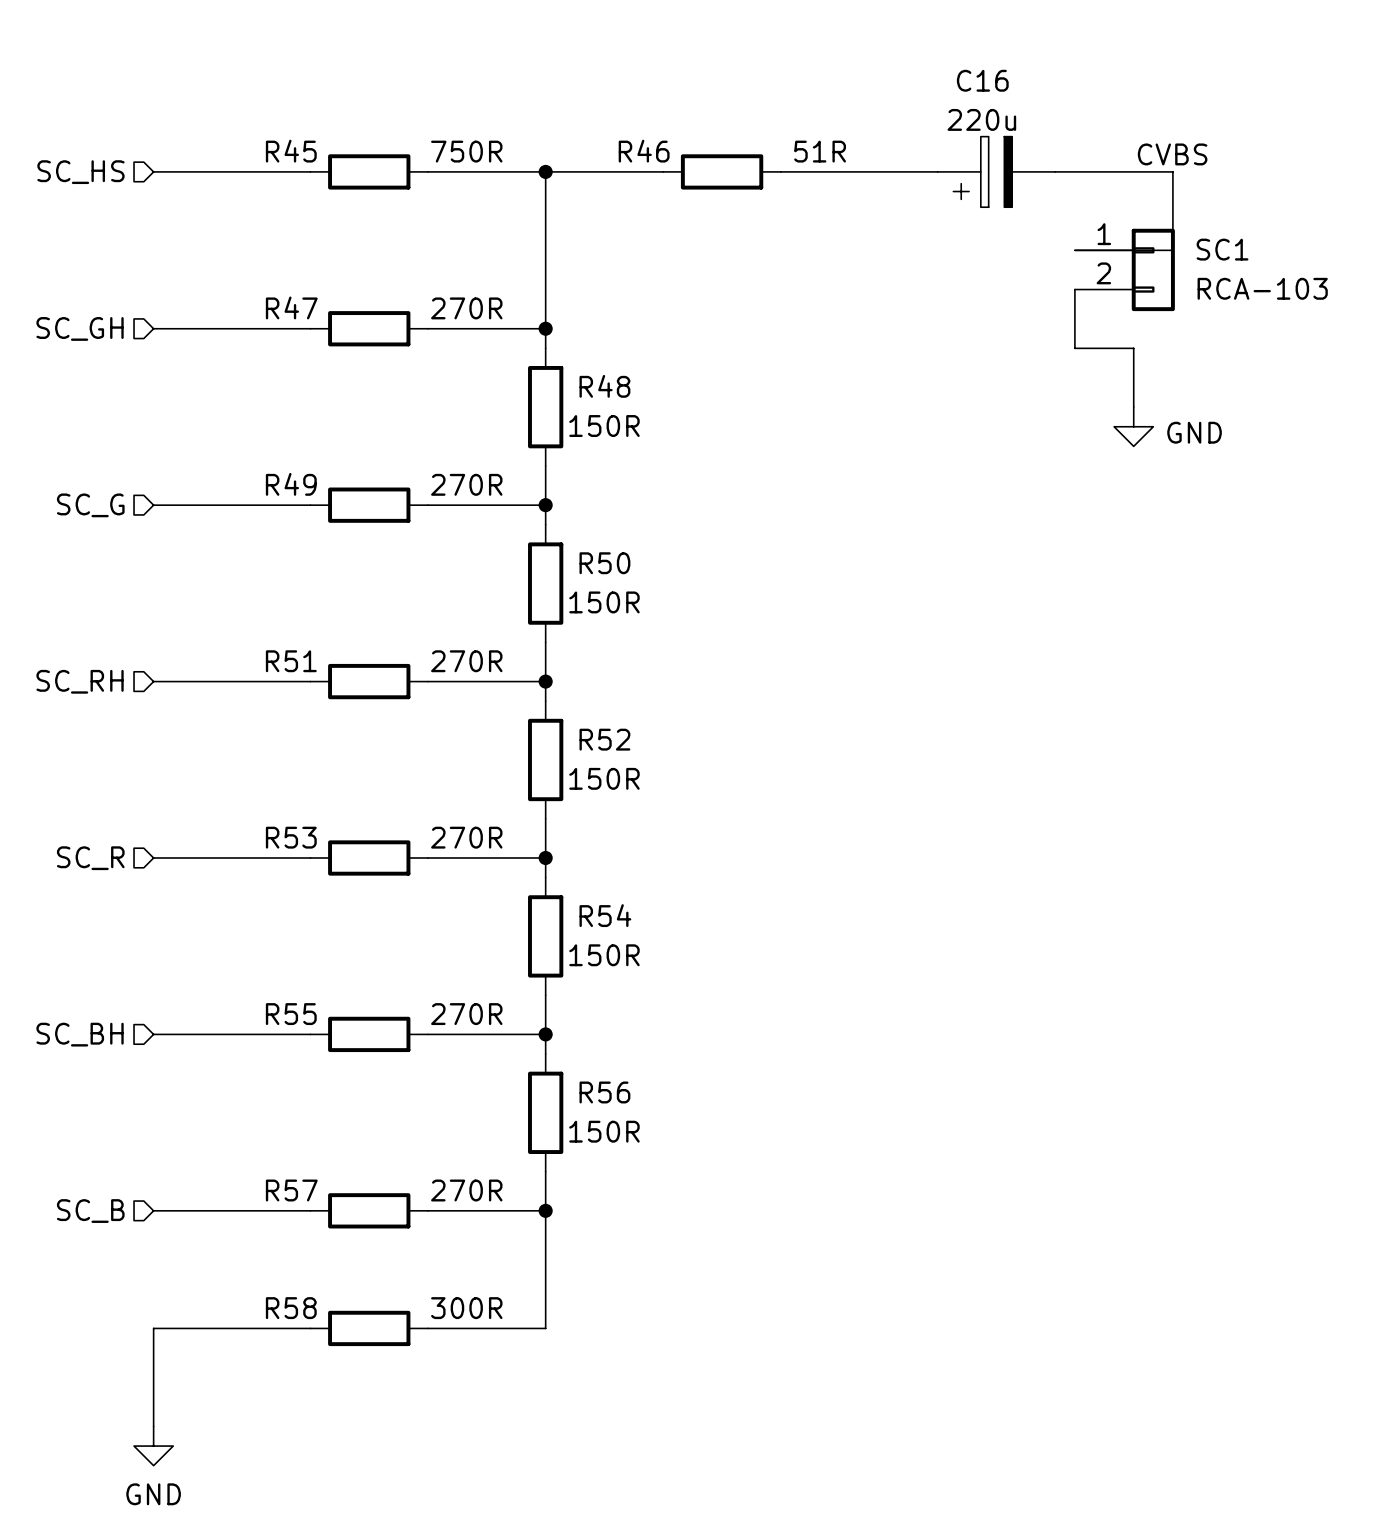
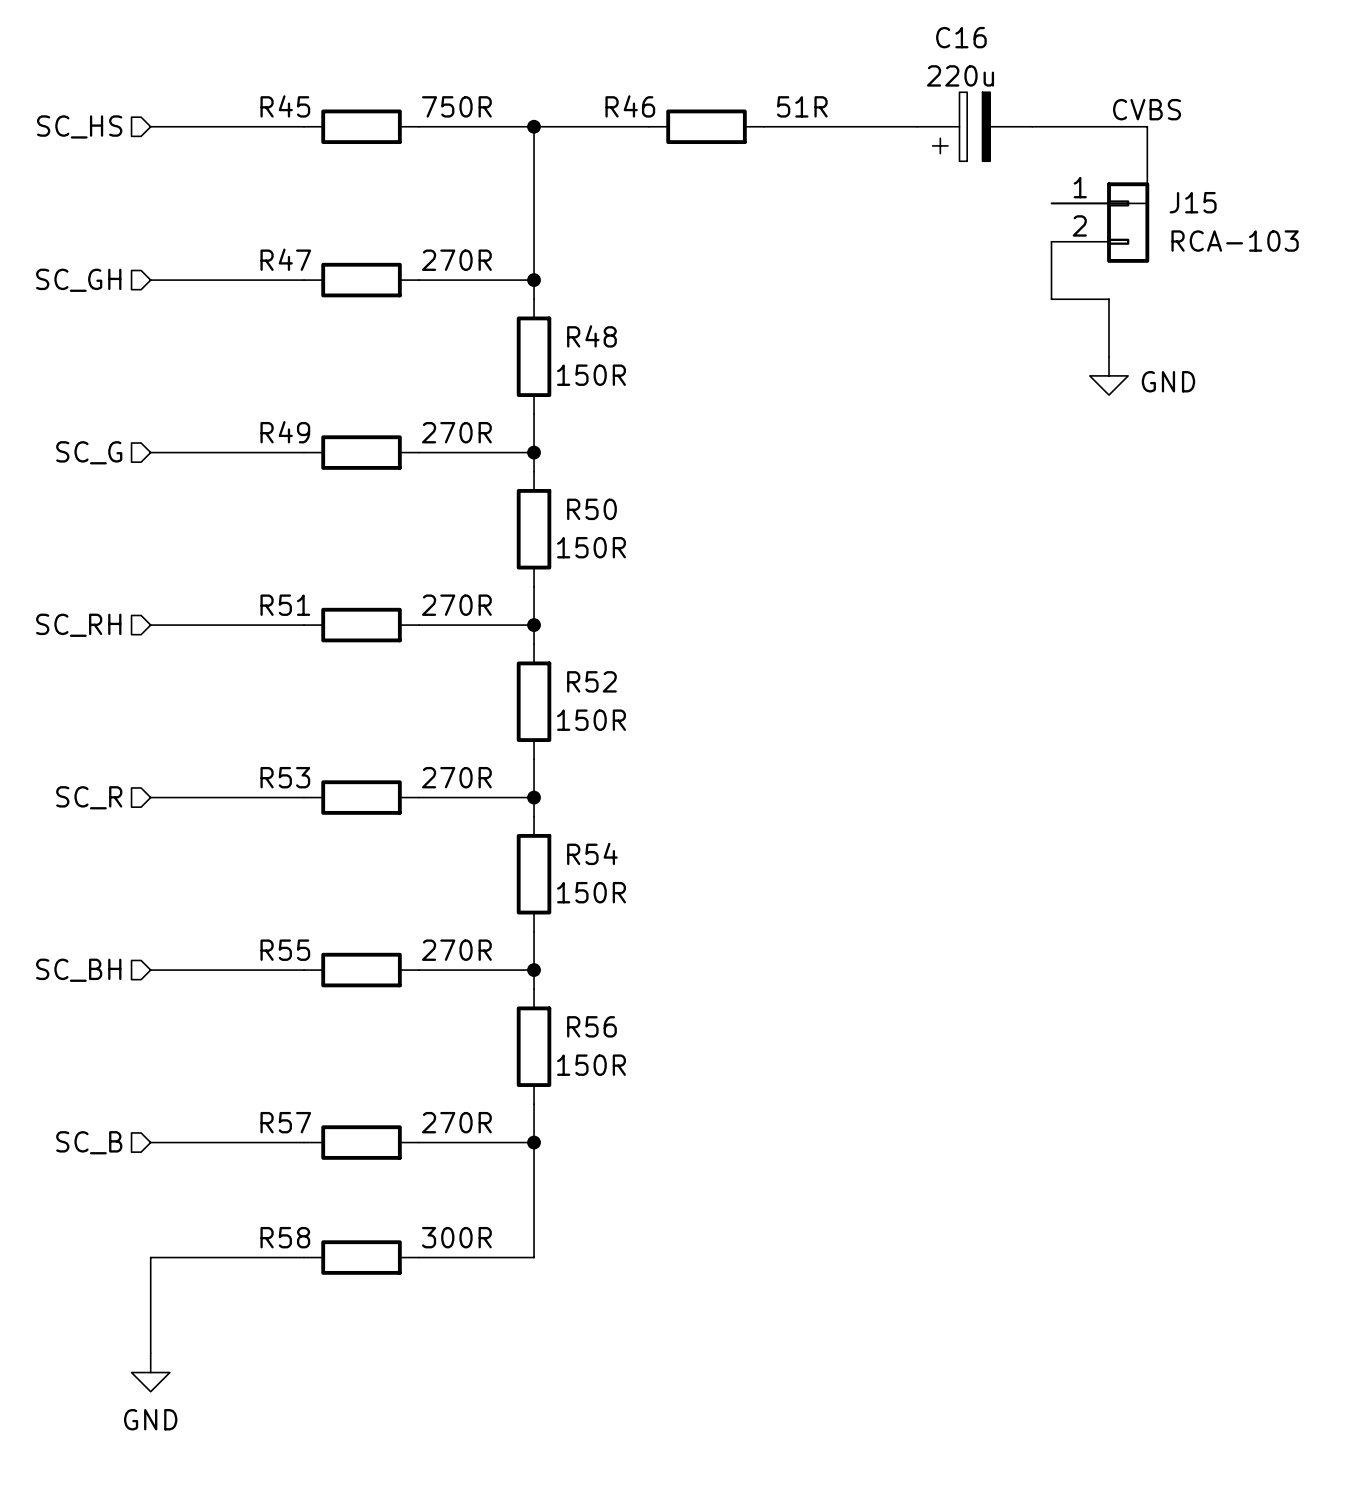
SC1 name: SC1 (1222, 249) -> J15 (1193, 202)

